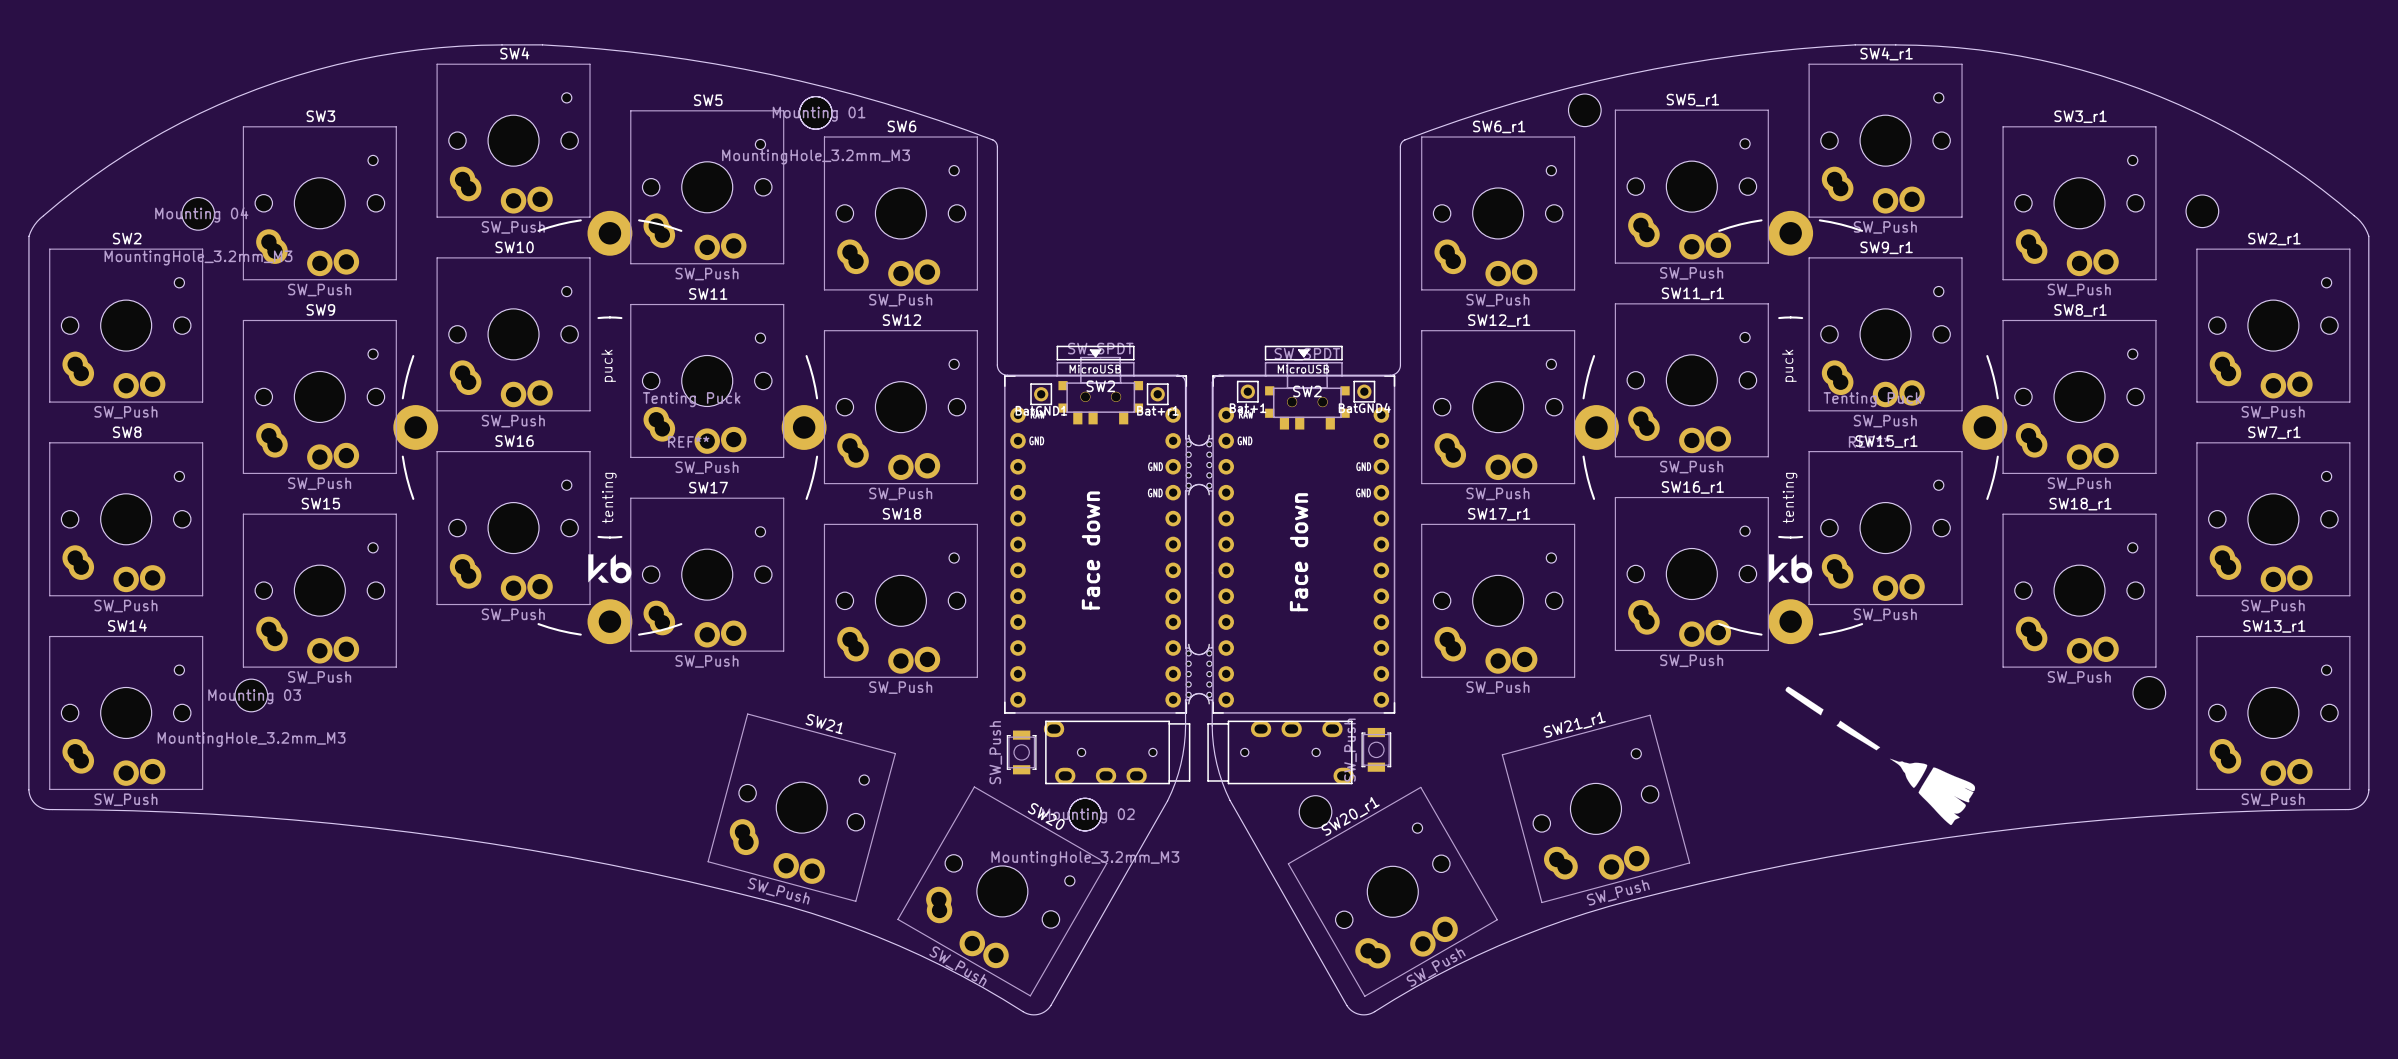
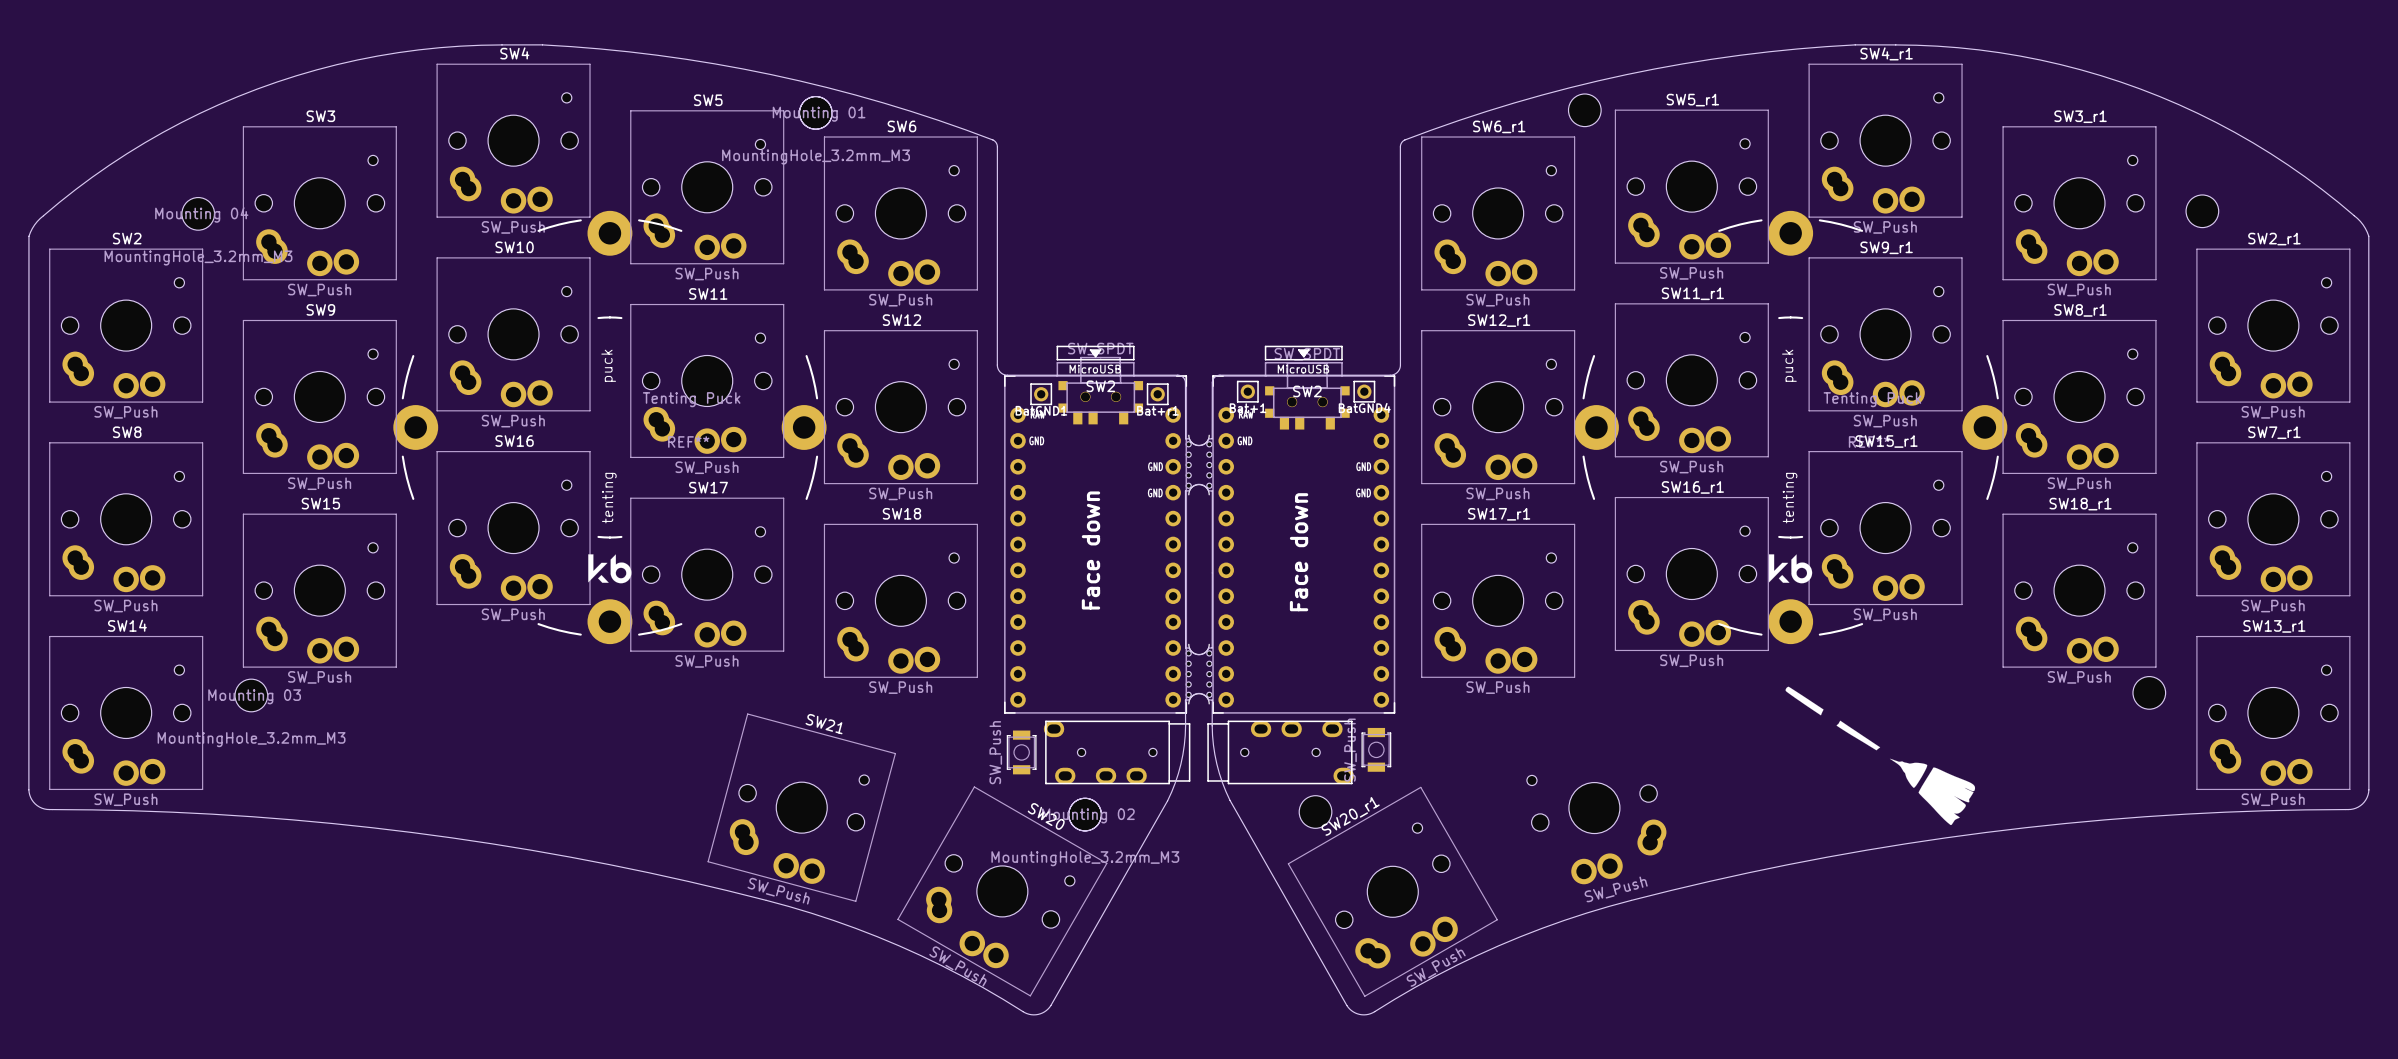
SW21_r1: SW_Push (1595, 808) -> none
part: none -> SW_Push (1596, 829)

